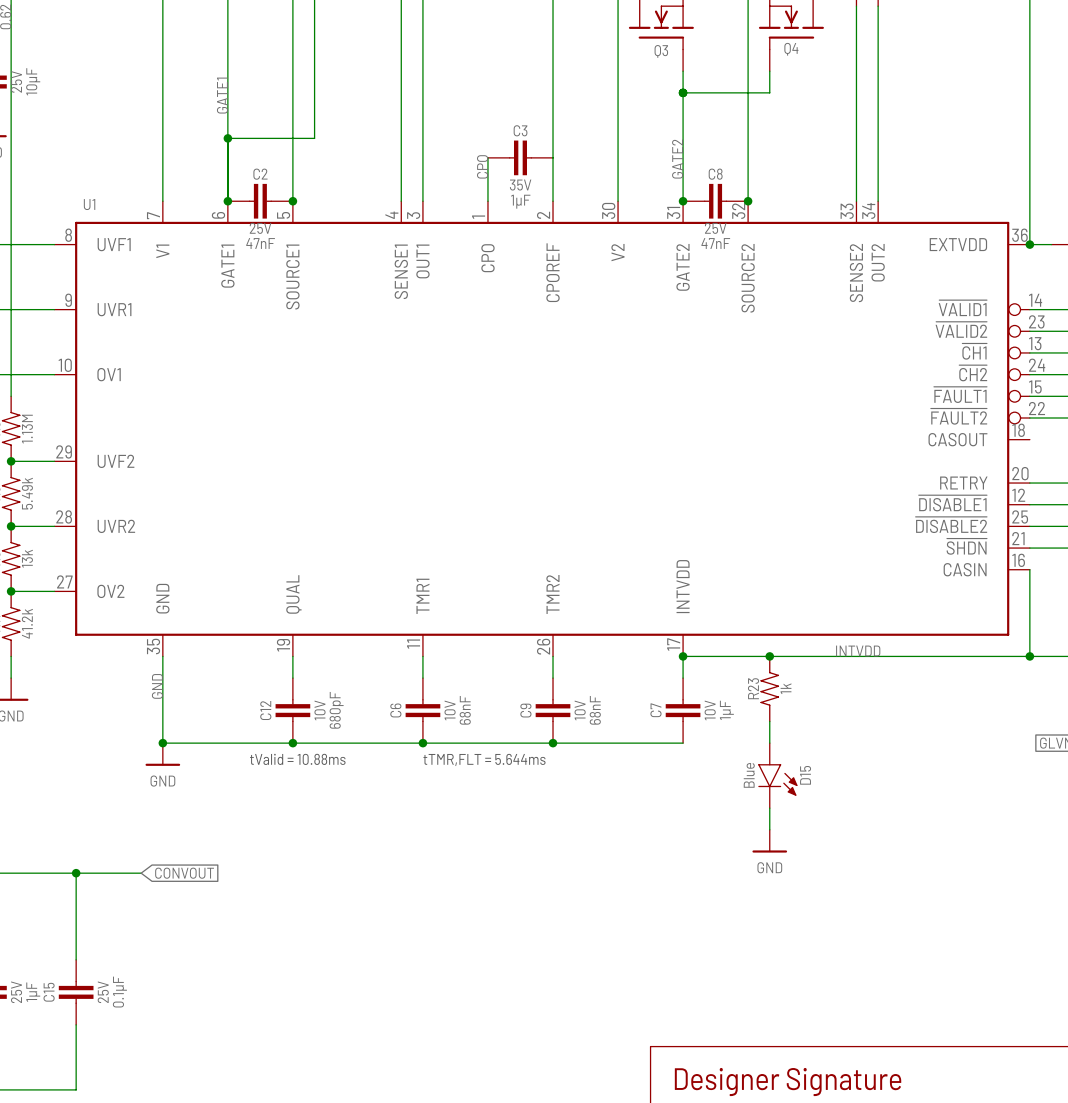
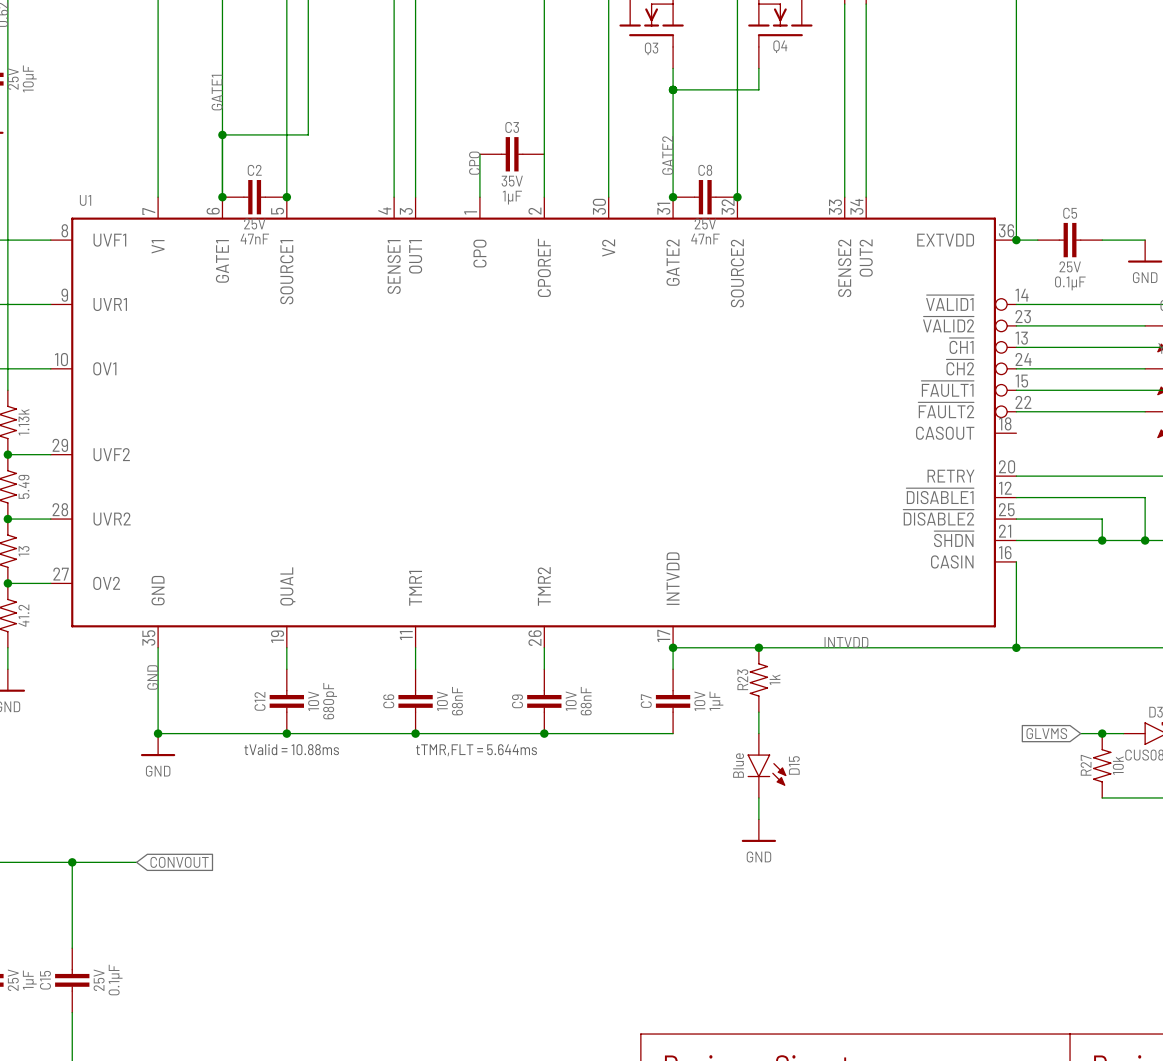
part text: 1.13M (27, 429) -> 1.13k (24, 422)
part text: 5.49k (27, 493) -> 5.49 (23, 486)
part text: 13k (27, 558) -> 13 (24, 551)
part text: 41.2k (27, 623) -> 41.2 (23, 615)

